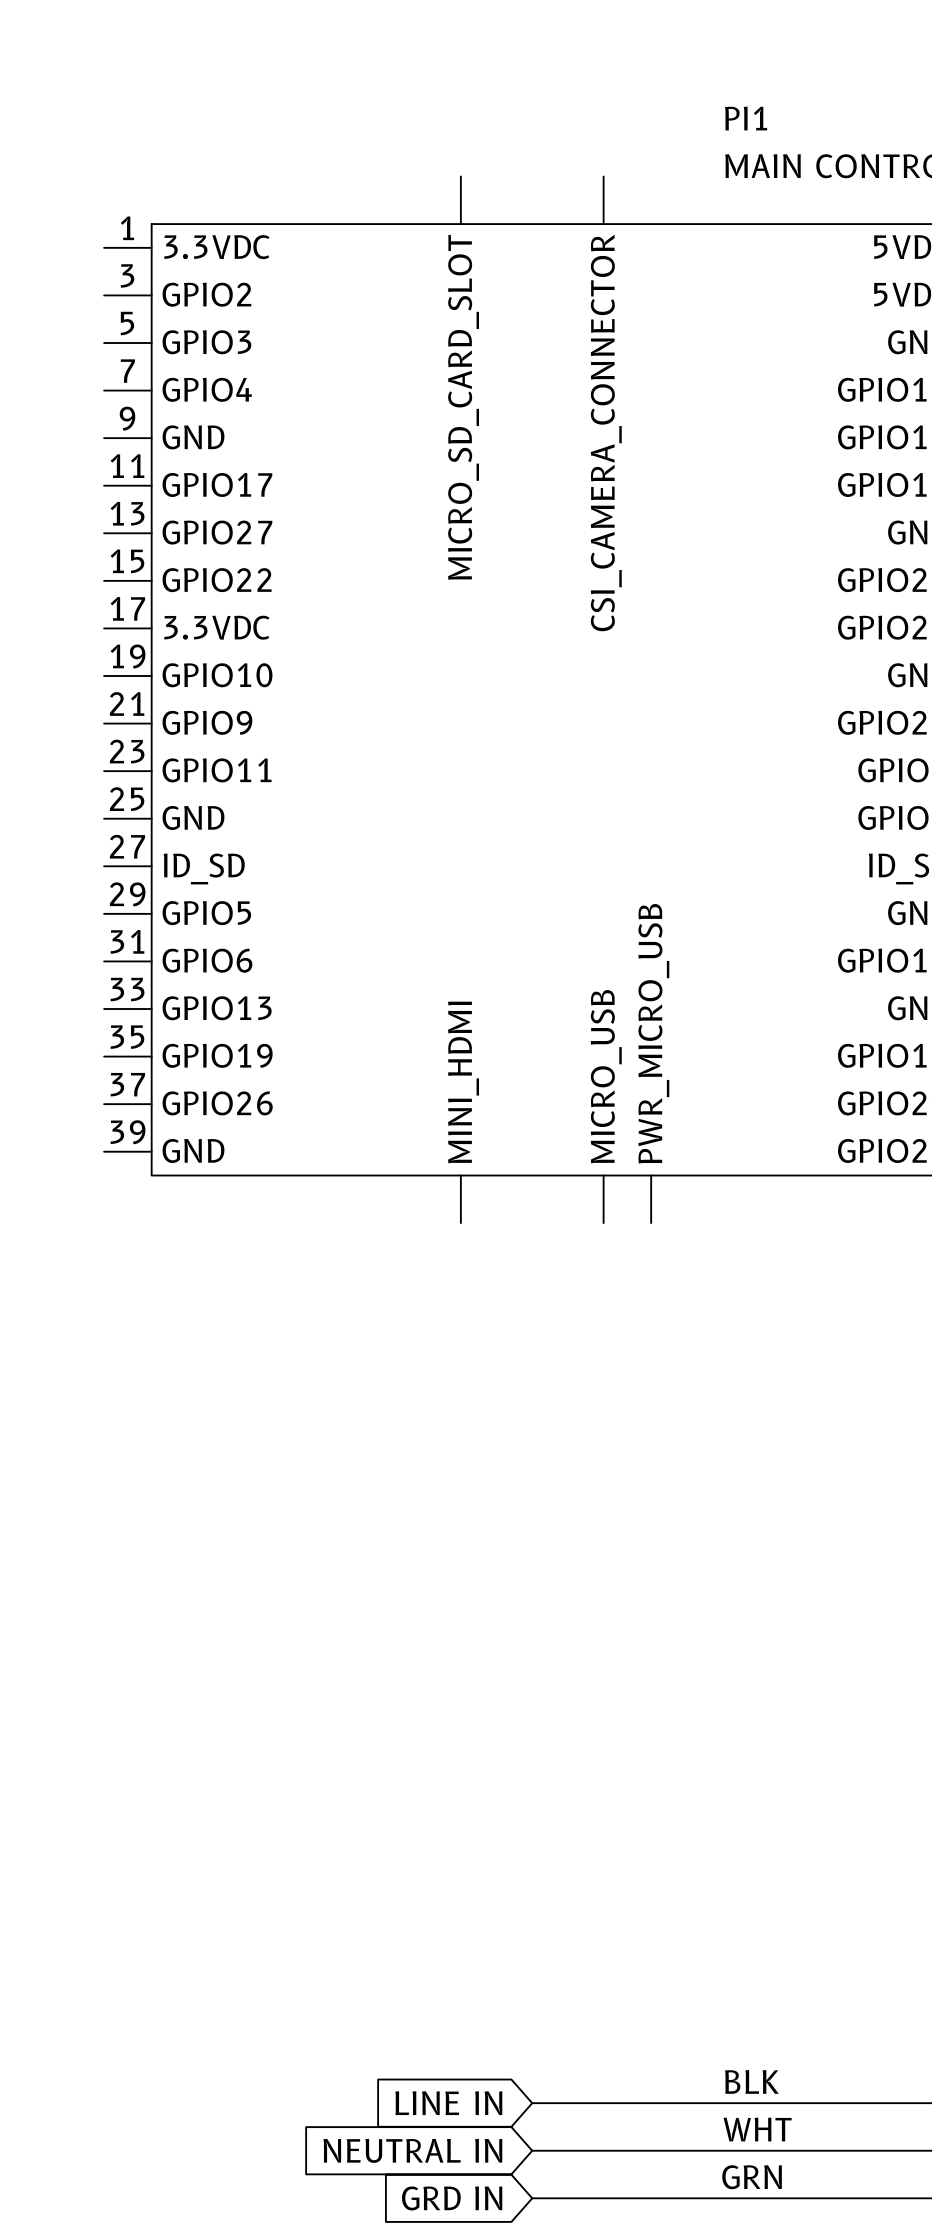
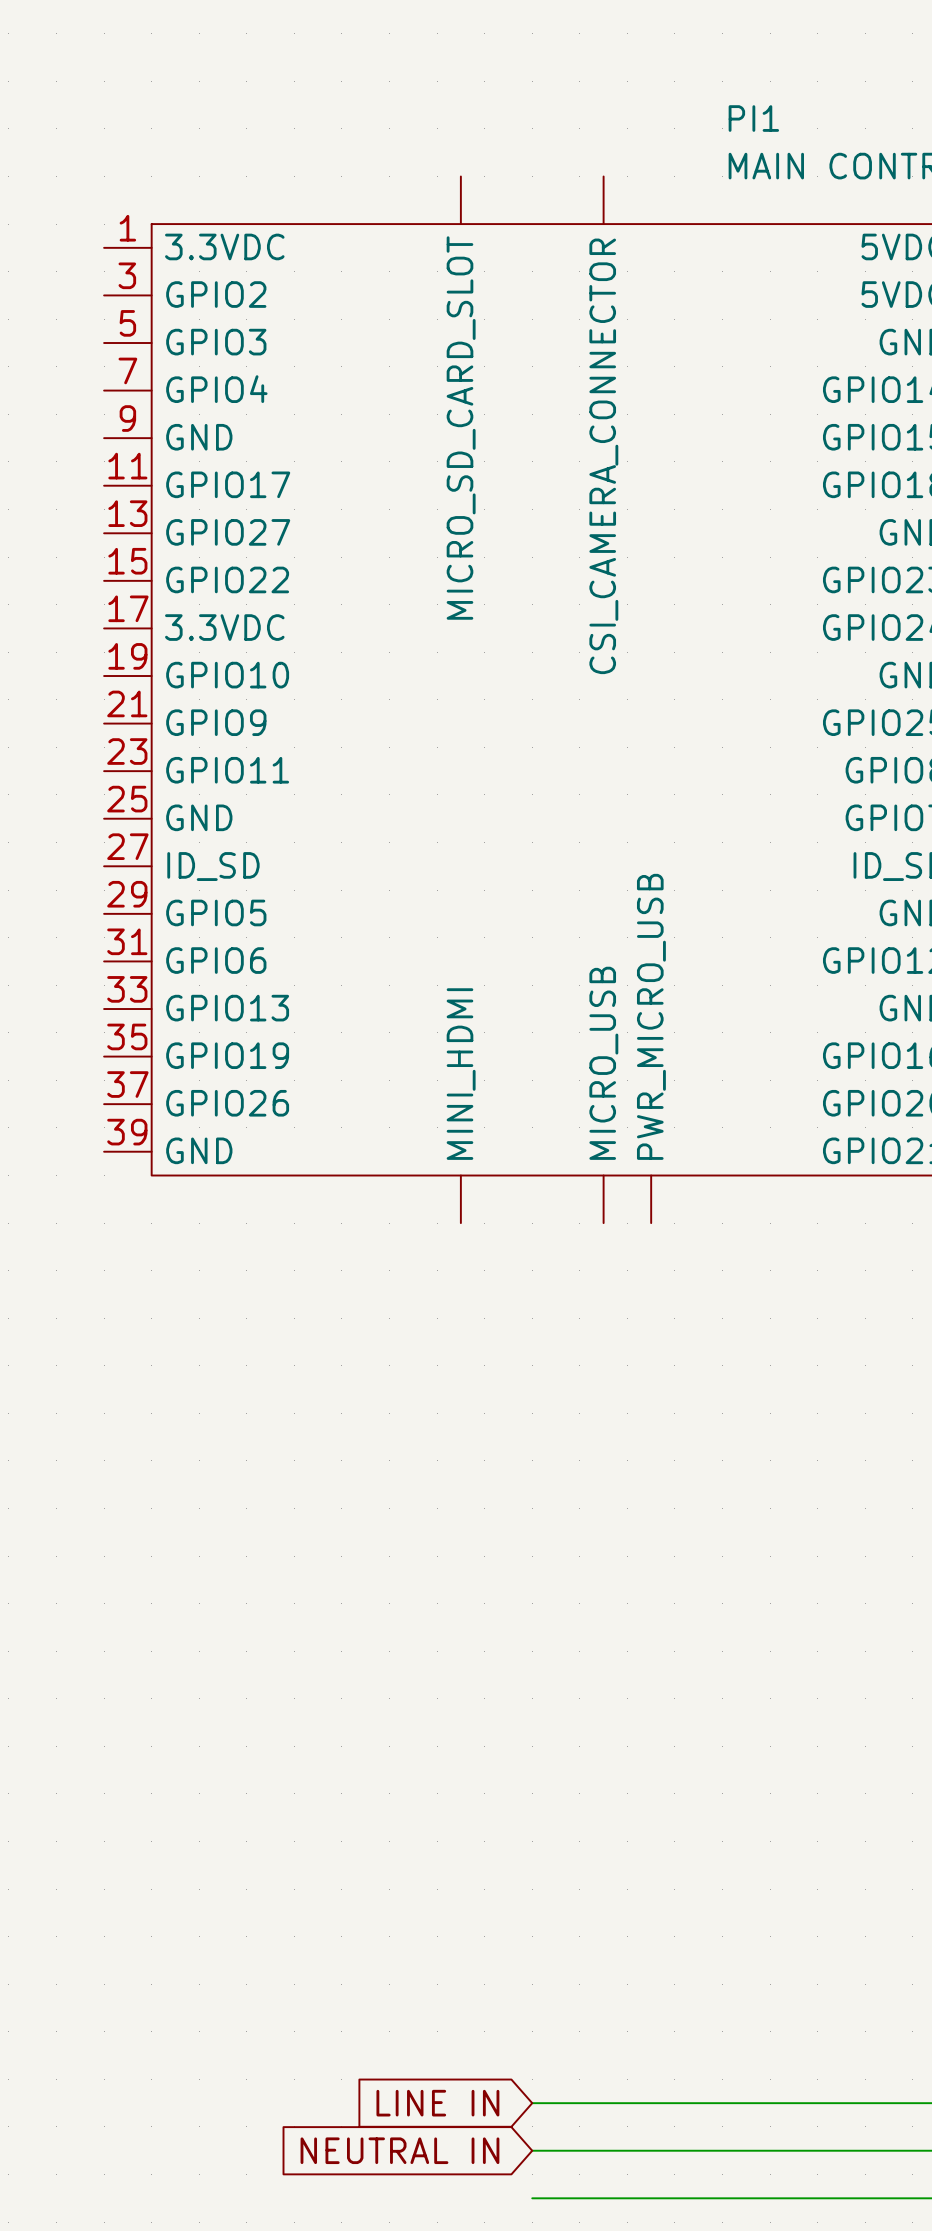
label: BLK (751, 2081) -> none
label: WHT (757, 2129) -> none
label: GRN (752, 2177) -> none
global label: GRD IN (452, 2198) -> none

